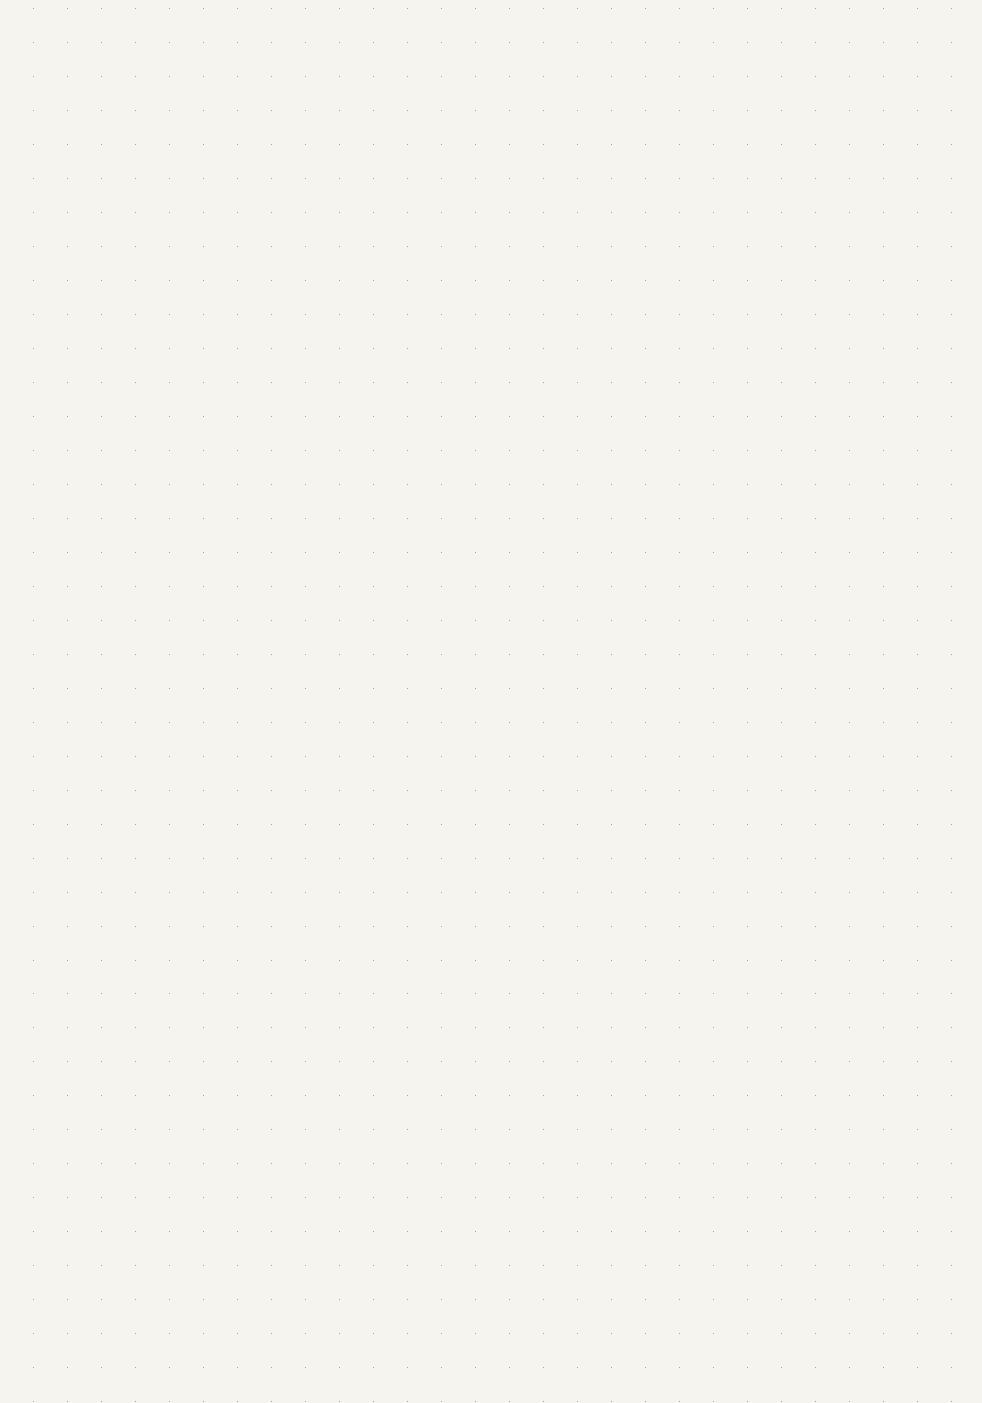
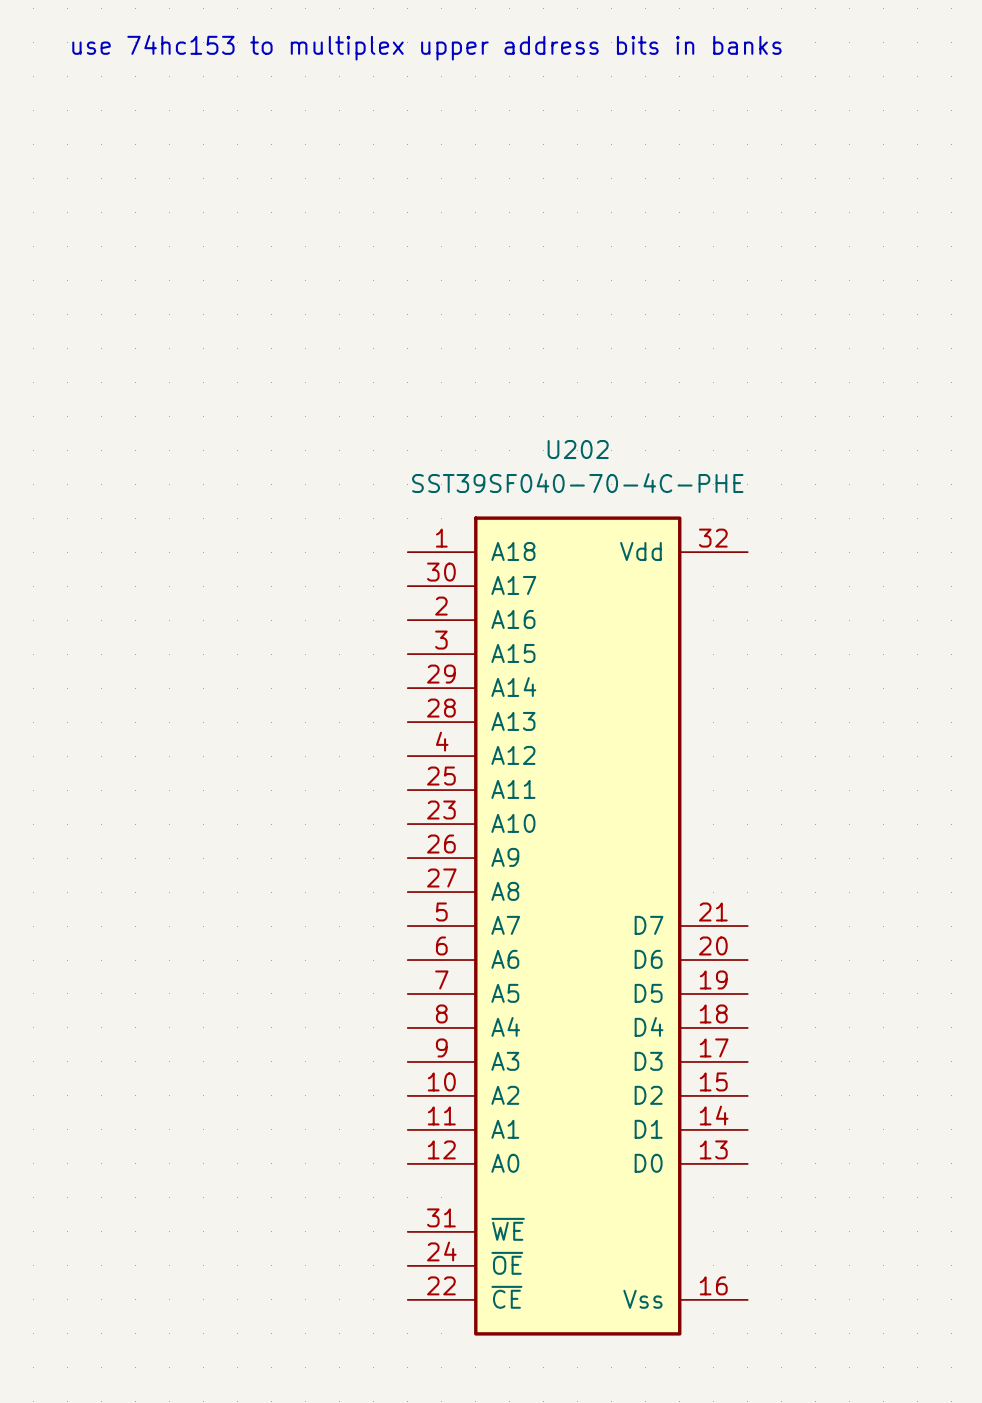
text: none -> use 74hc153 to multiplex upper address bits in banks (426, 47)
U202: none -> SST39SF040-70-4C-PHE (577, 926)

